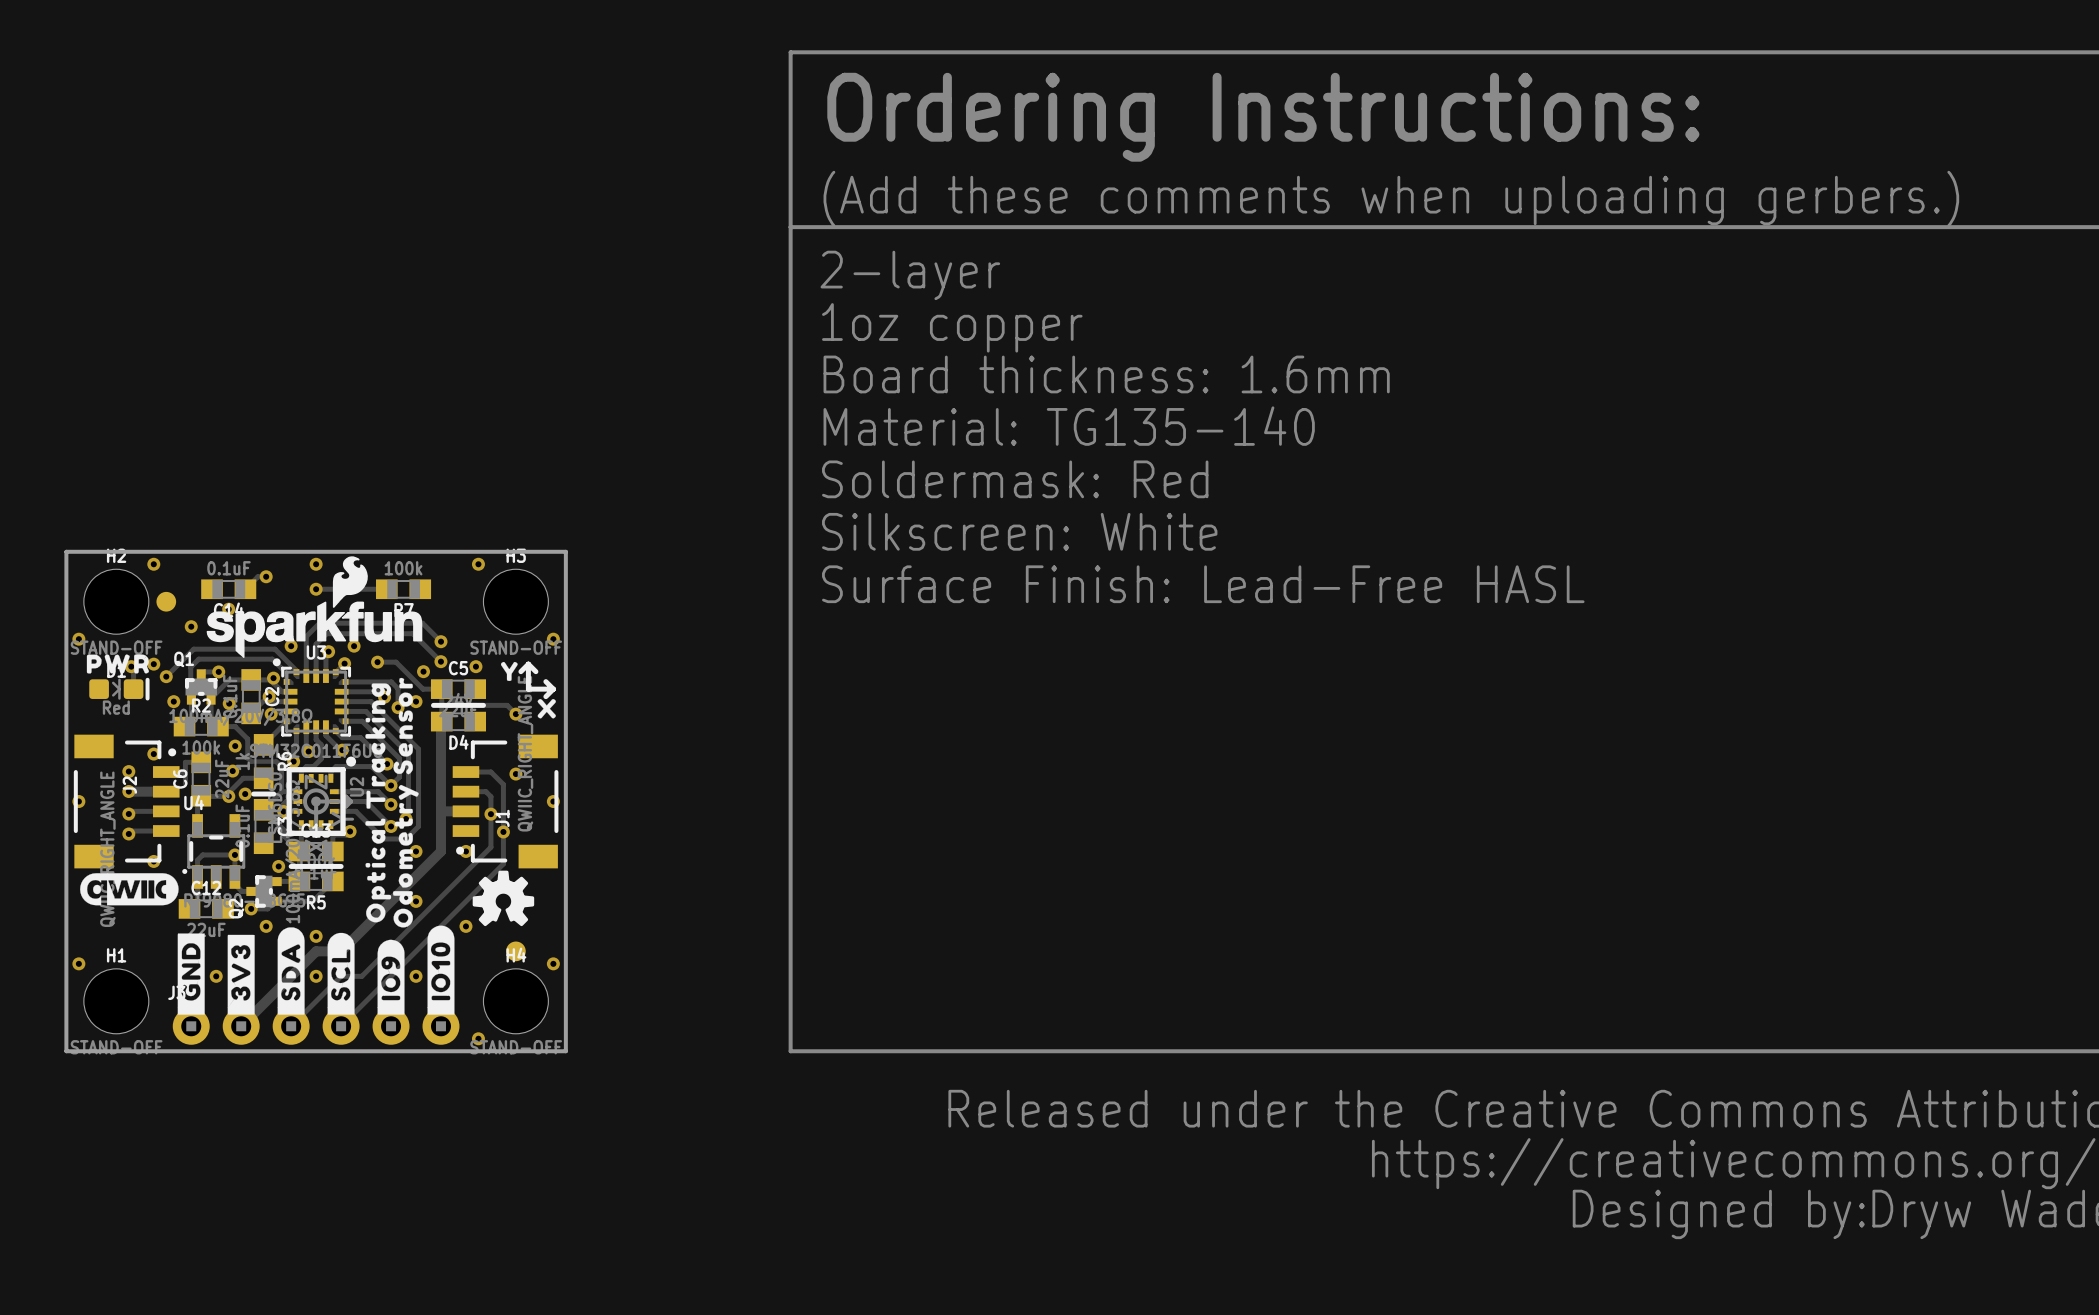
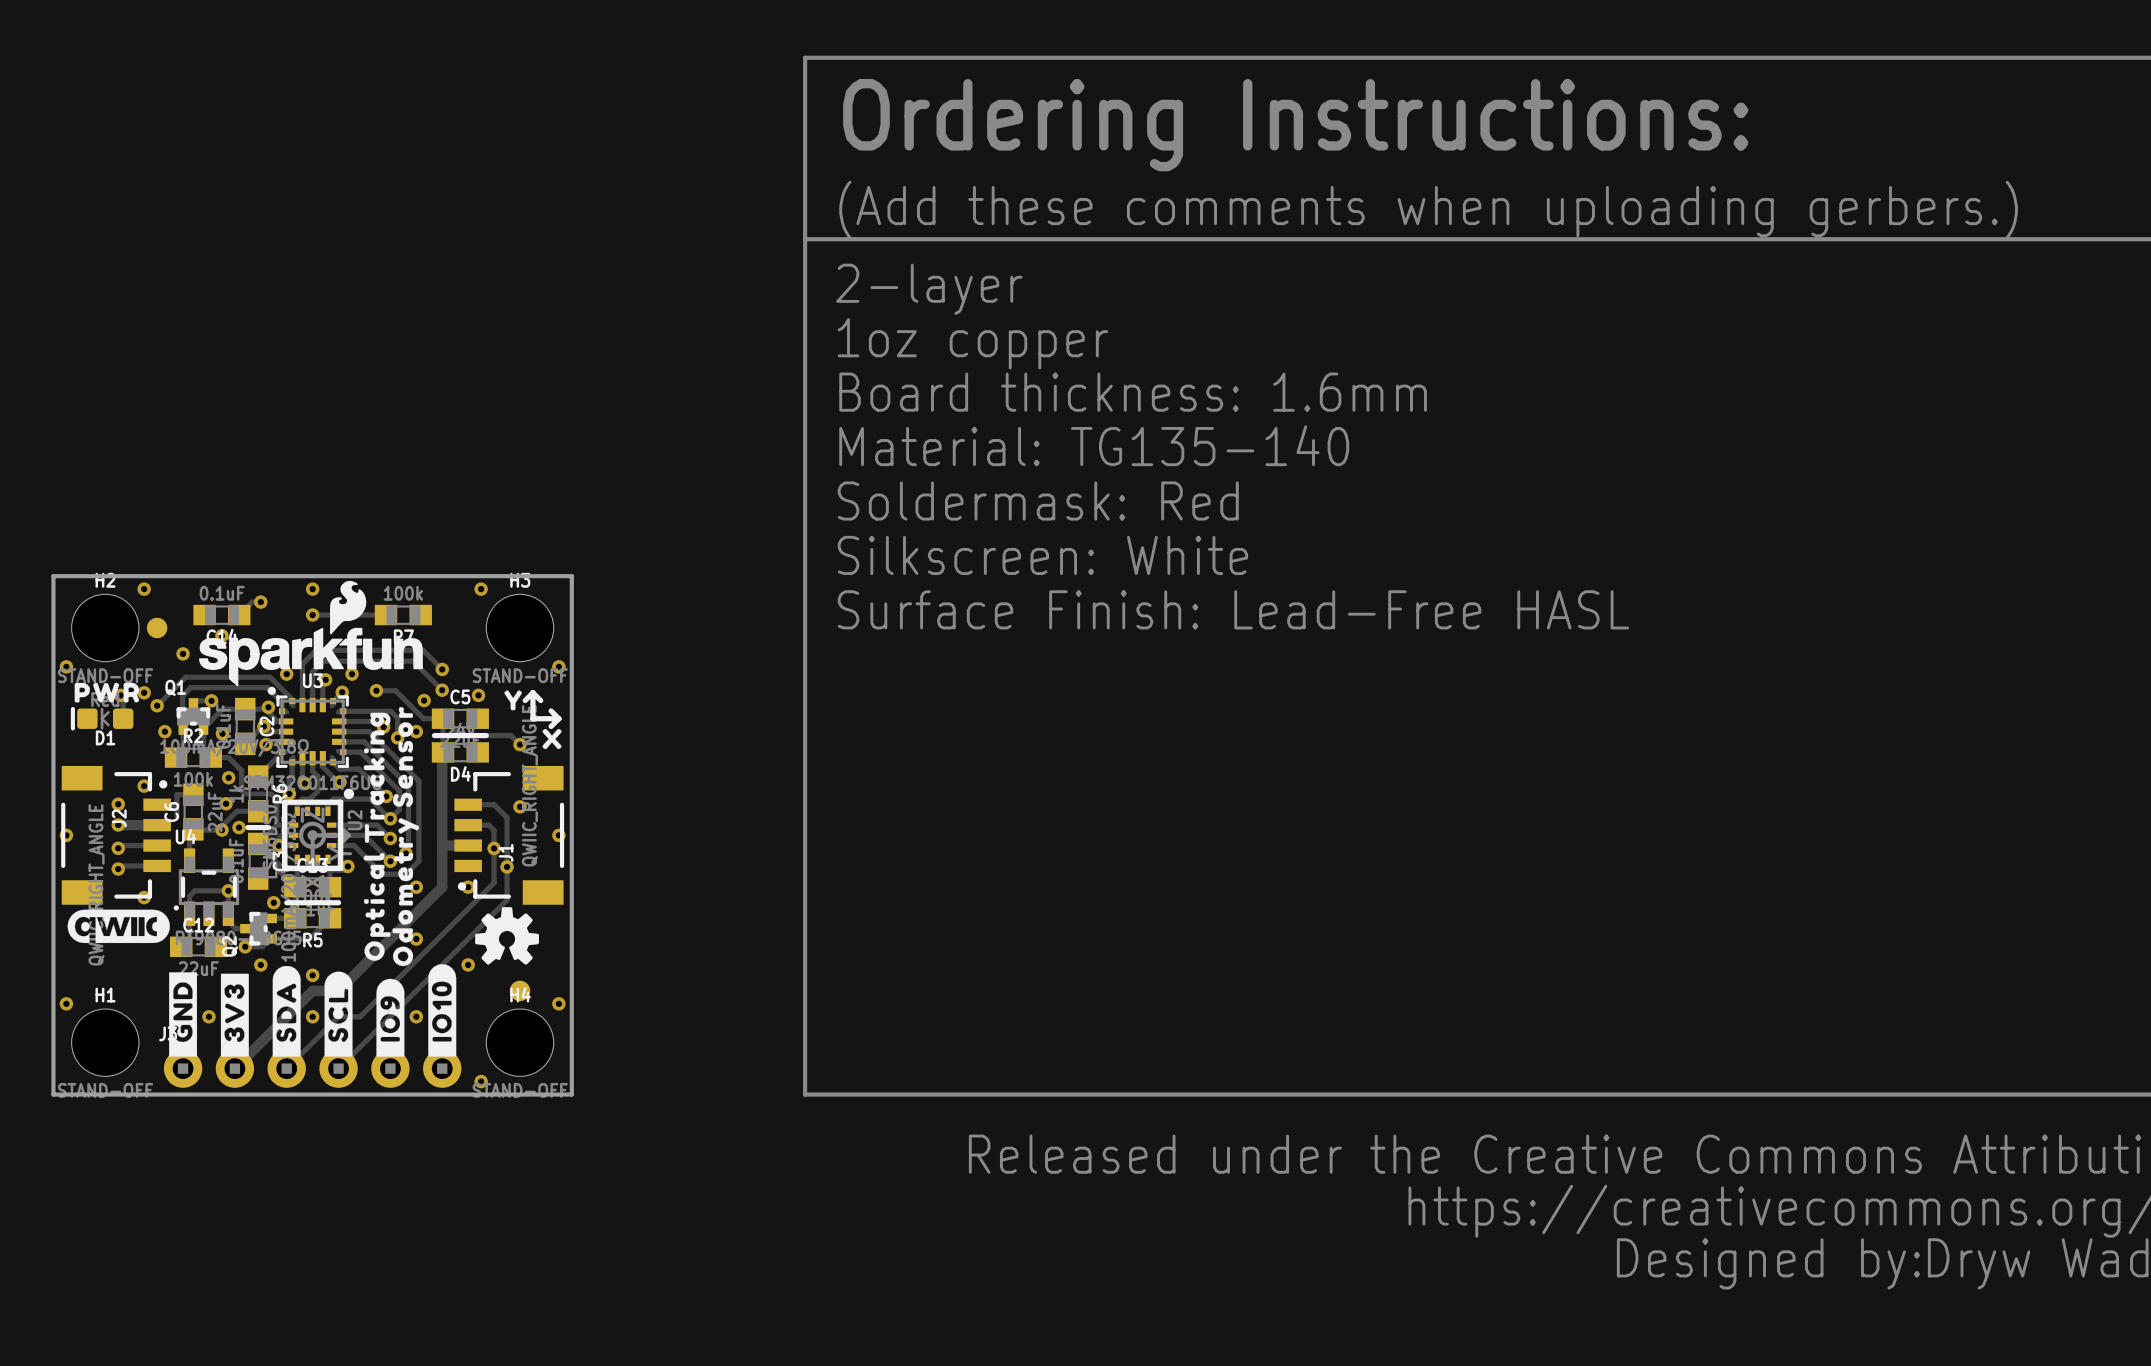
D1 rotation: 0° (119, 689) -> 180° (102, 718)

